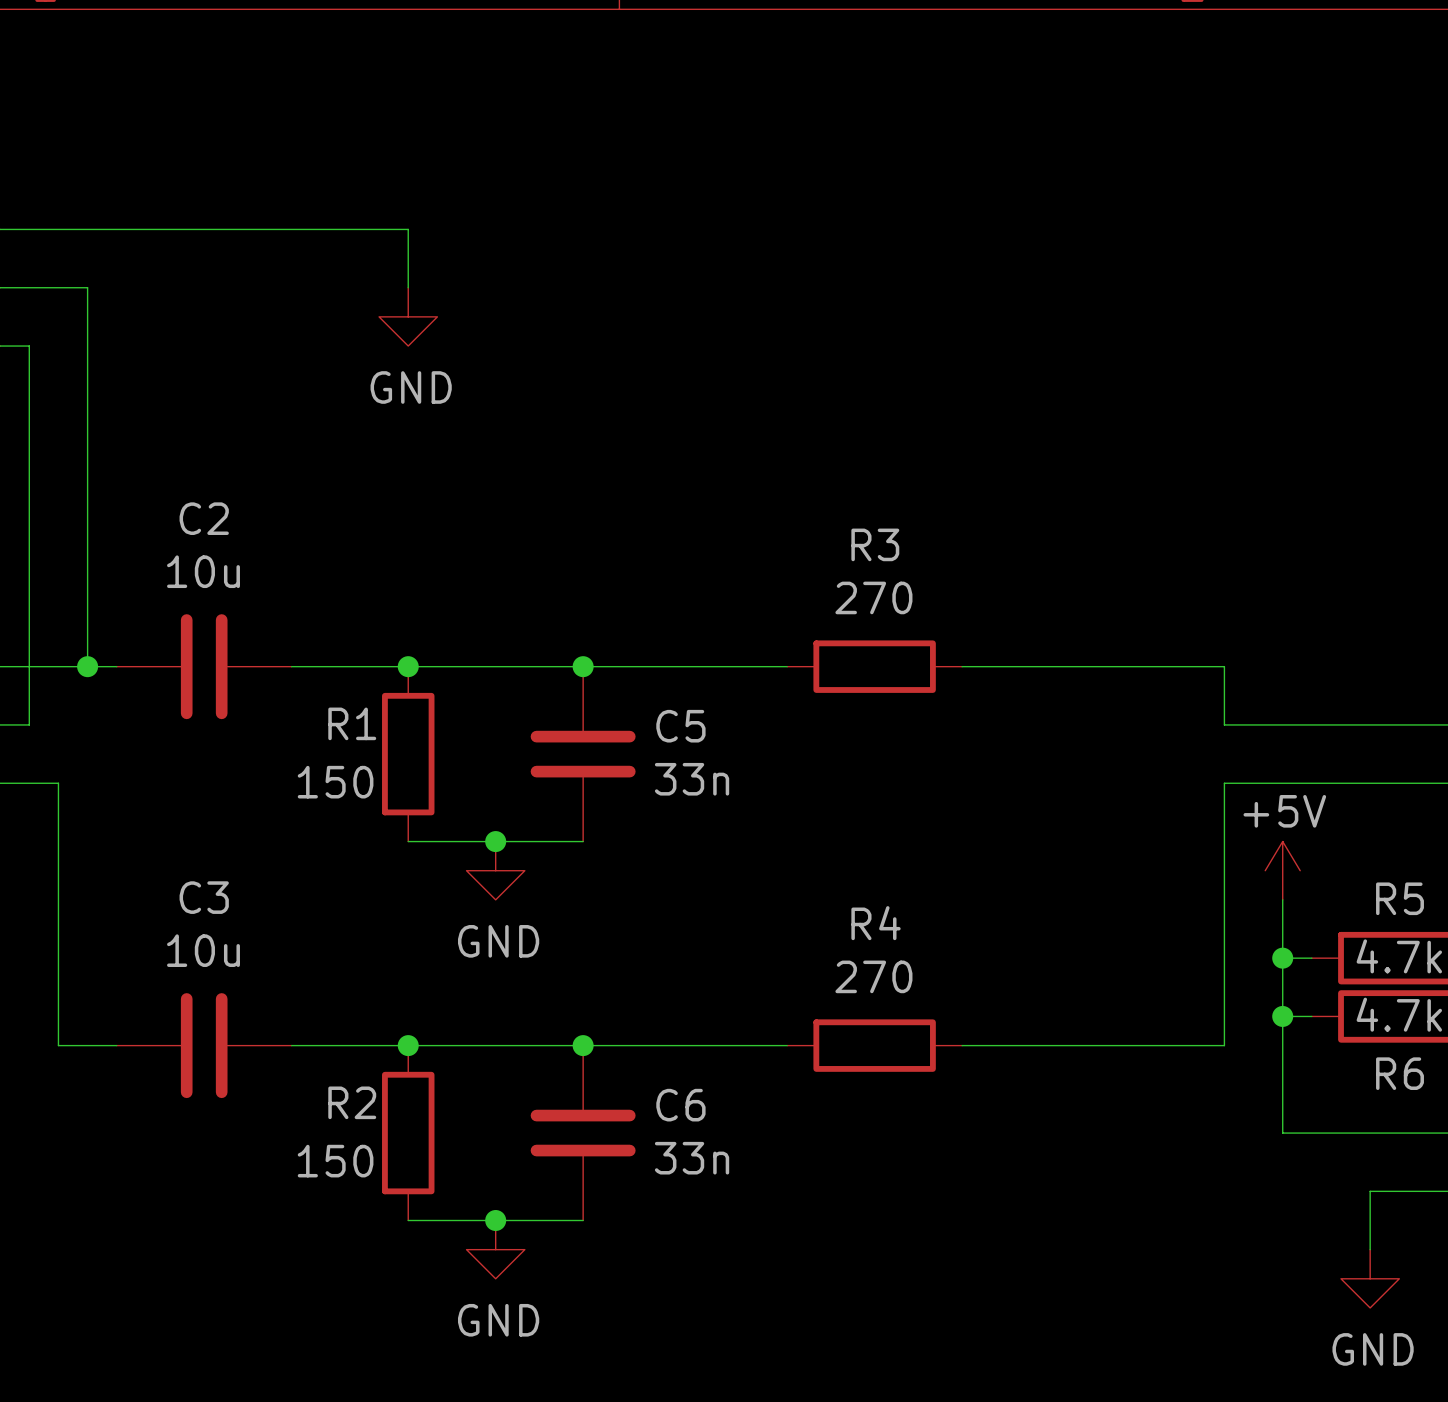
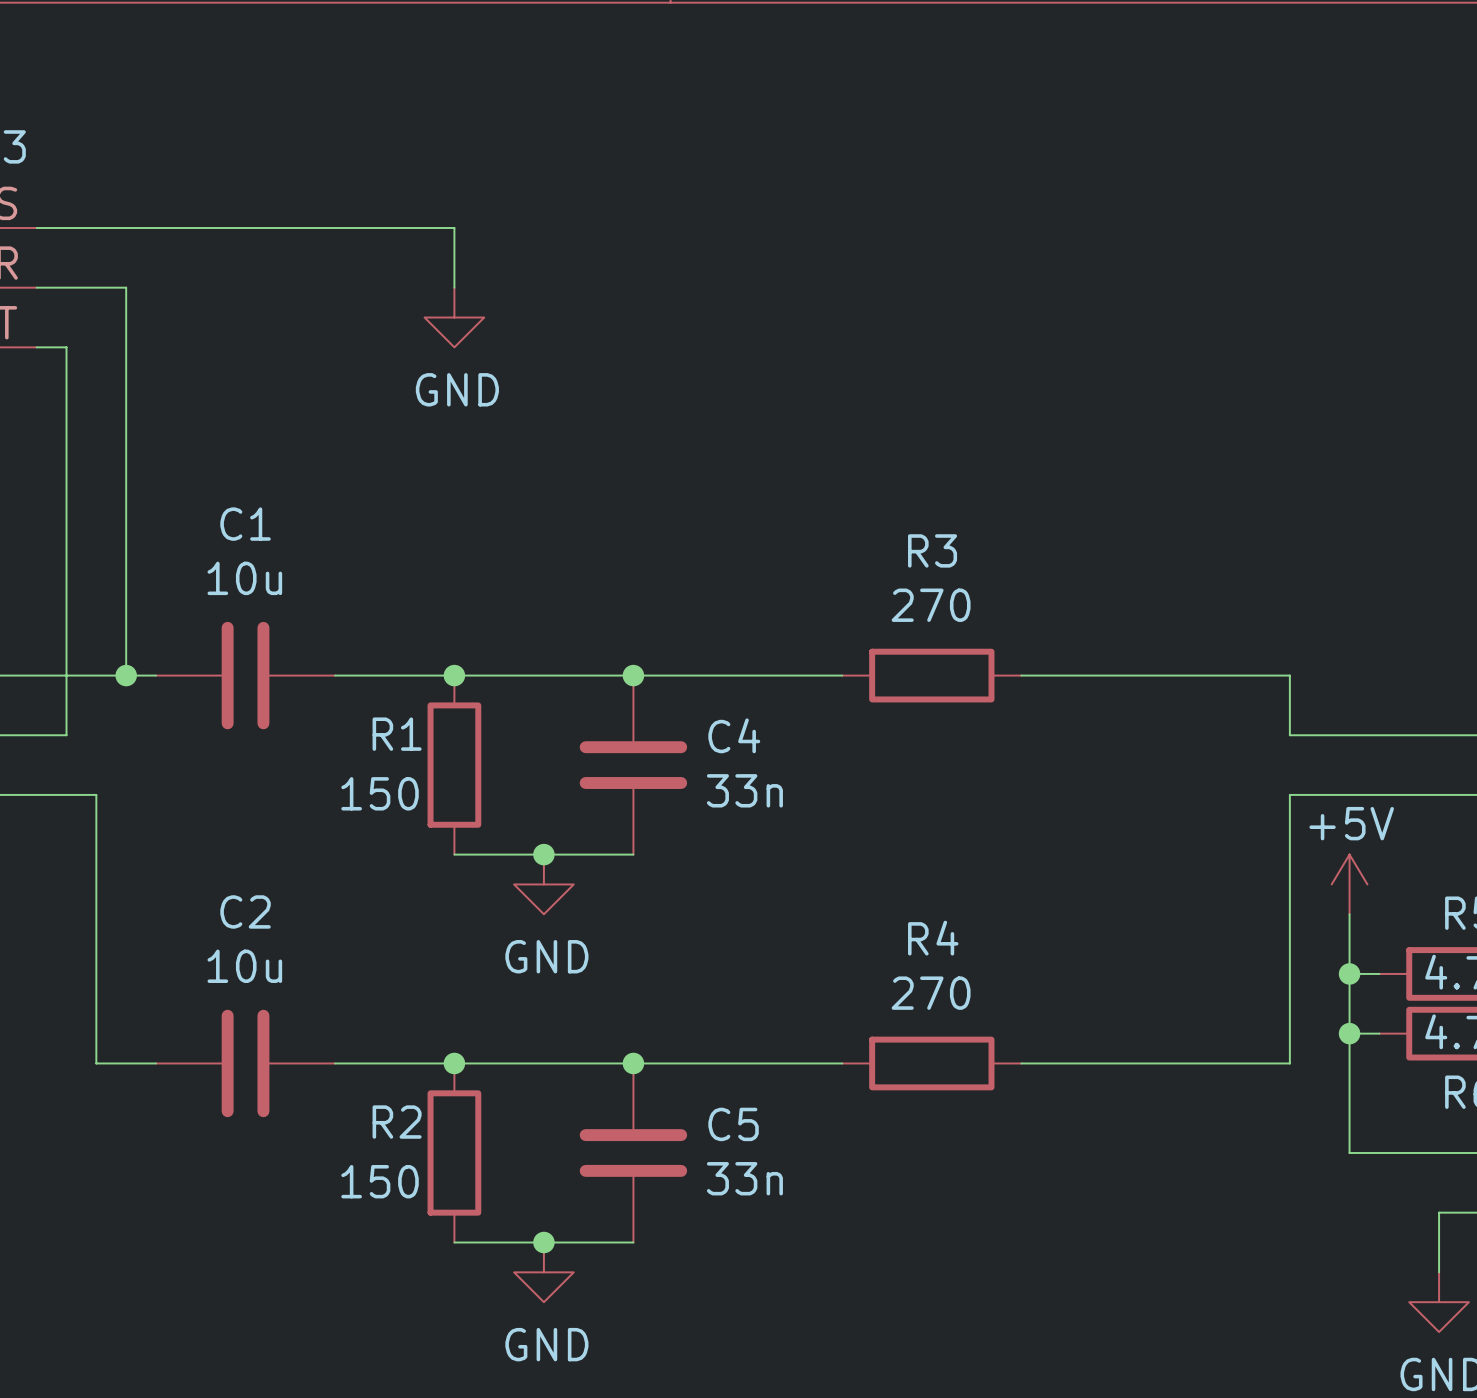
C2 name: C2 (204, 518) -> C1 (245, 524)
C5 name: C5 (680, 726) -> C4 (734, 735)
C3 name: C3 (204, 897) -> C2 (245, 911)
C6 name: C6 (680, 1105) -> C5 (733, 1124)

